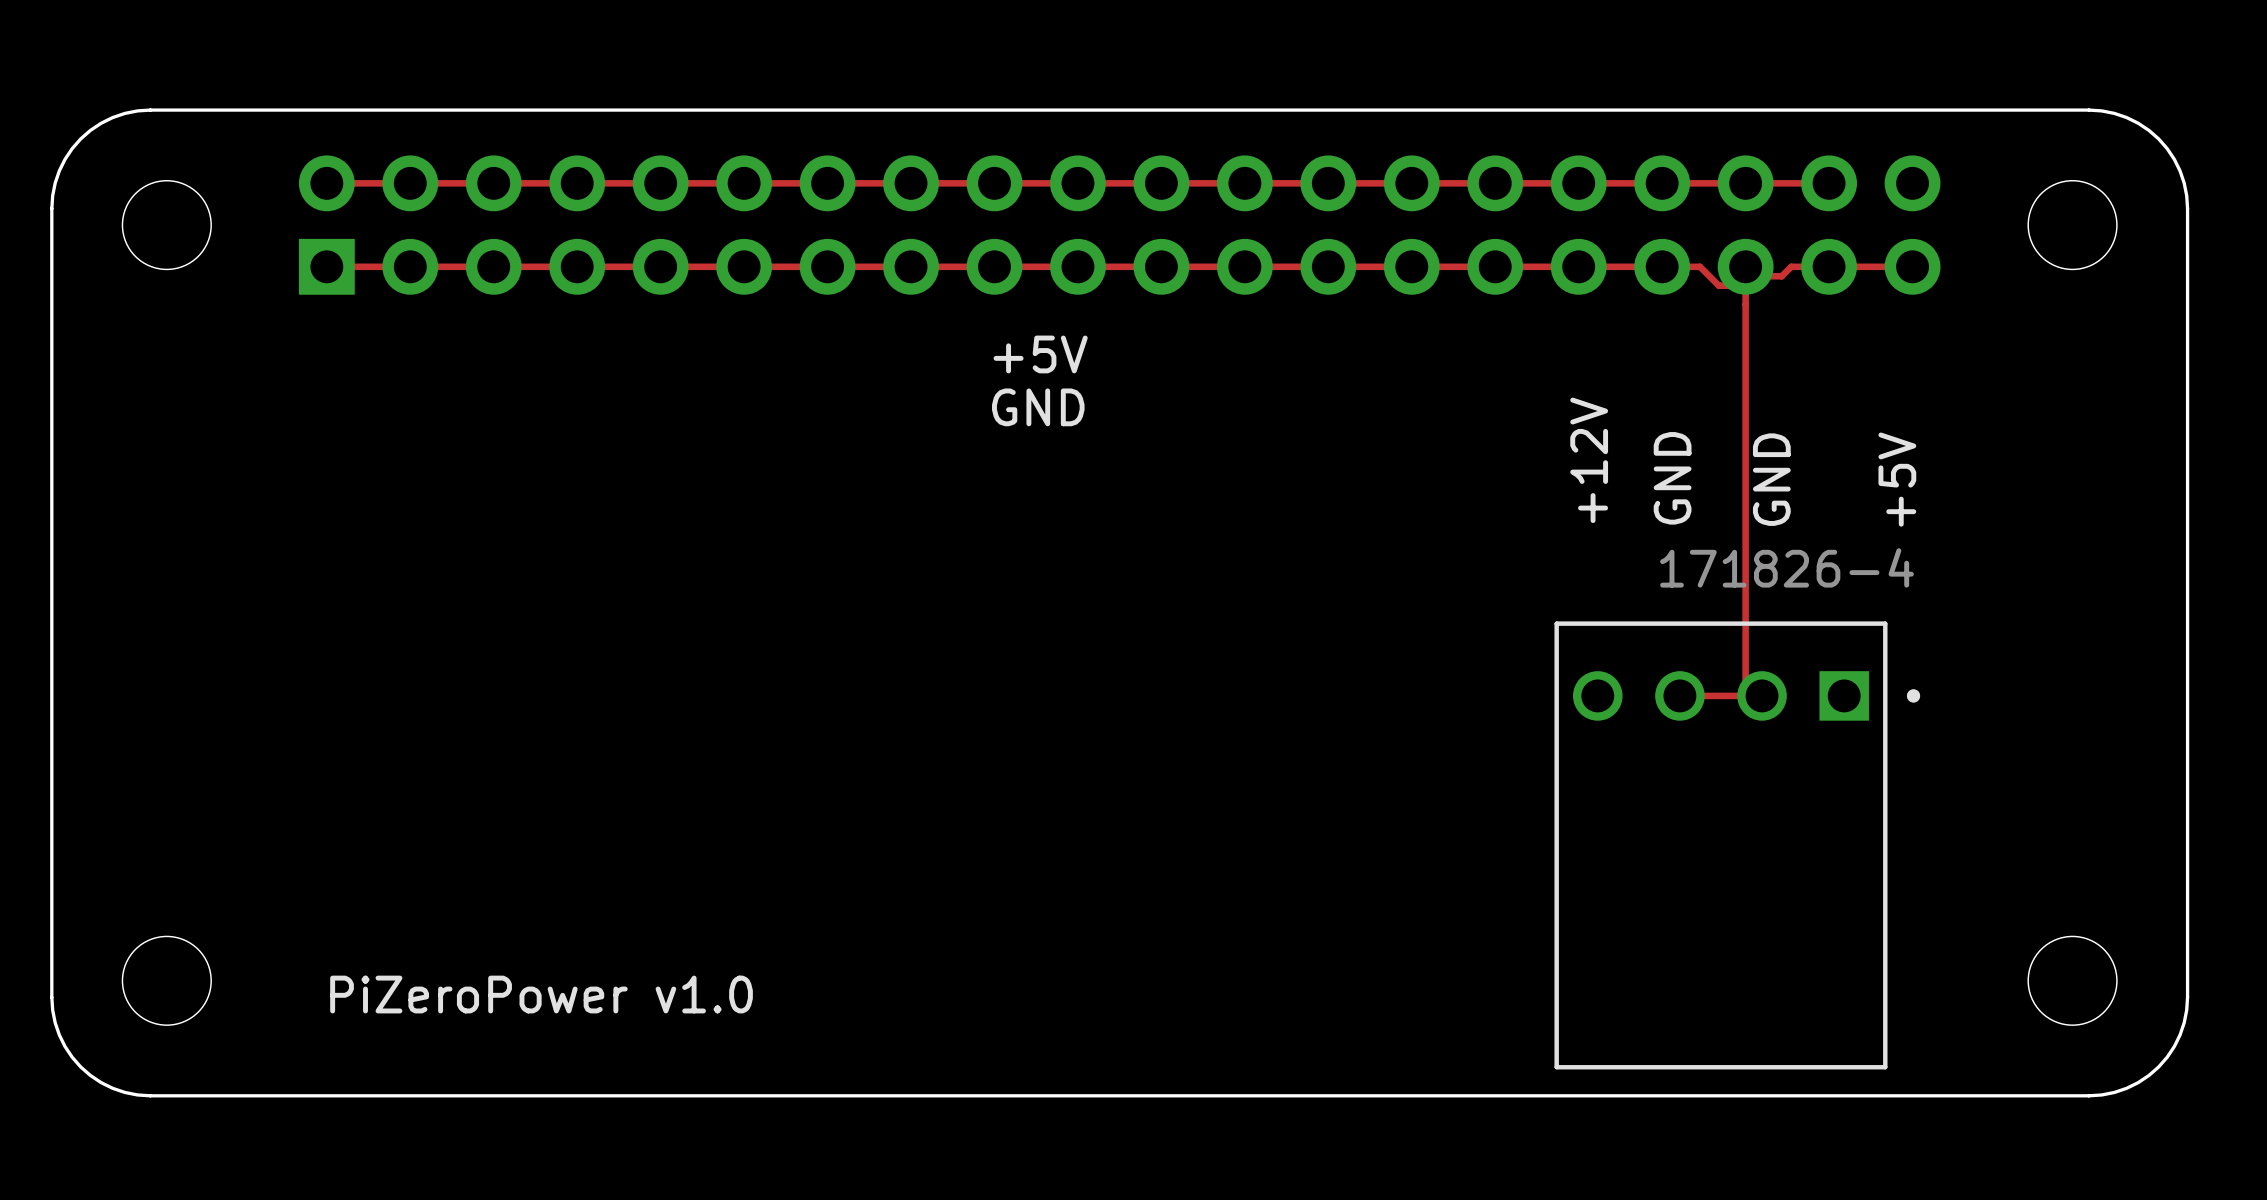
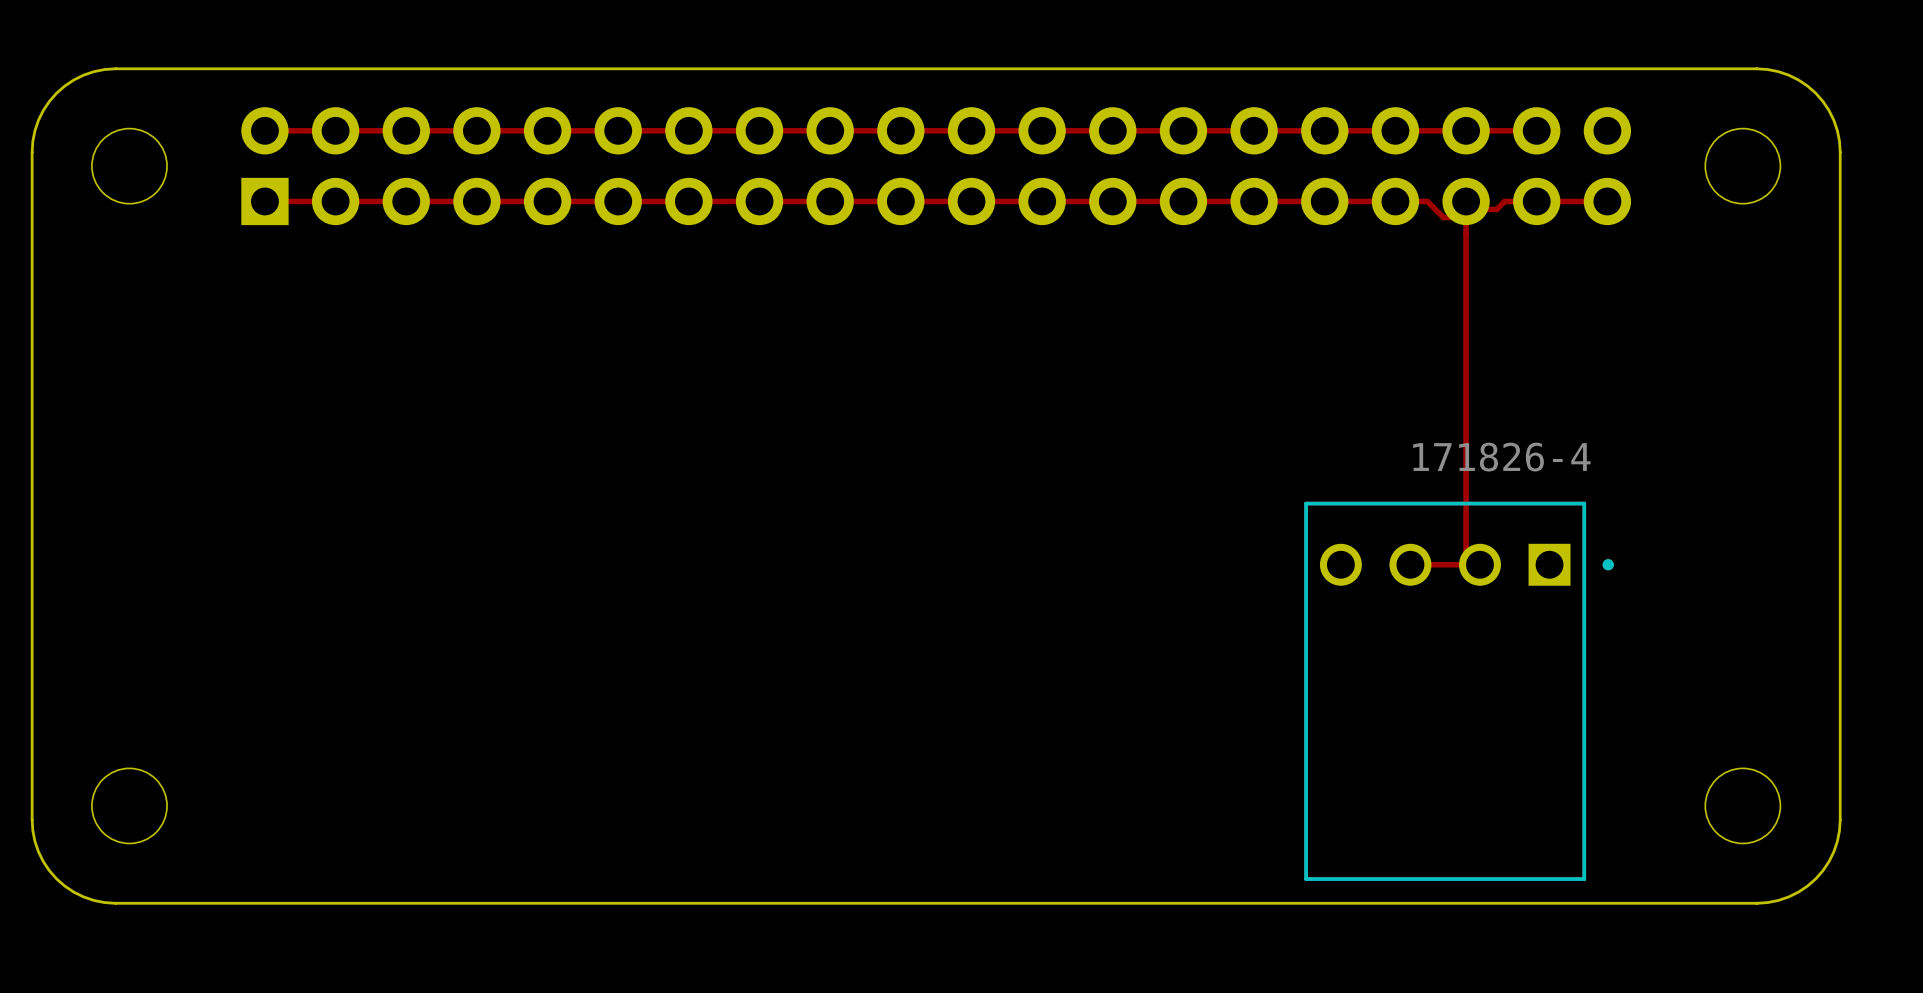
text: +5V (1040, 354) -> none
text: GND (1038, 407) -> none
text: +12V (1589, 460) -> none
text: GND (1672, 478) -> none
text: GND (1771, 479) -> none
text: +5V (1897, 479) -> none
text: PiZeroPower v1.0 (541, 994) -> none

